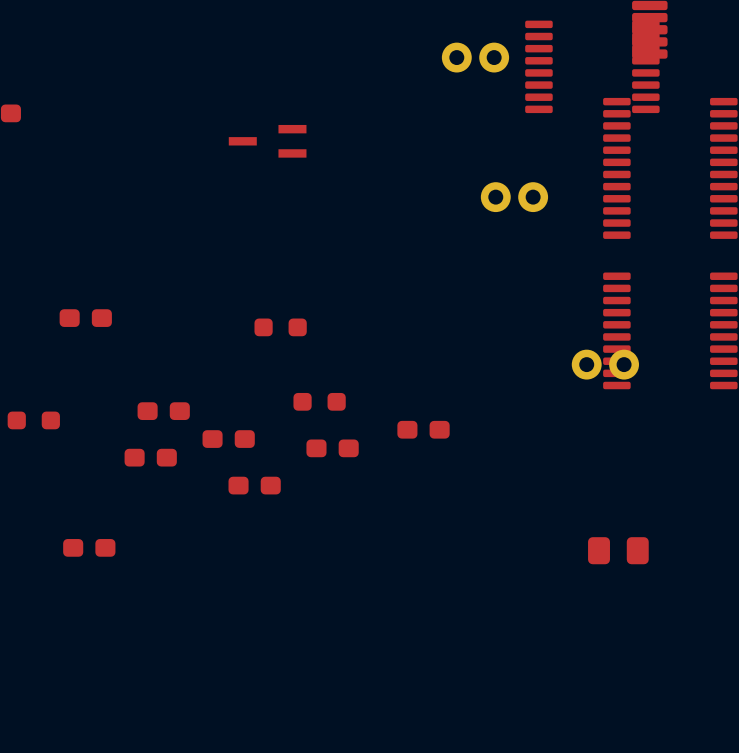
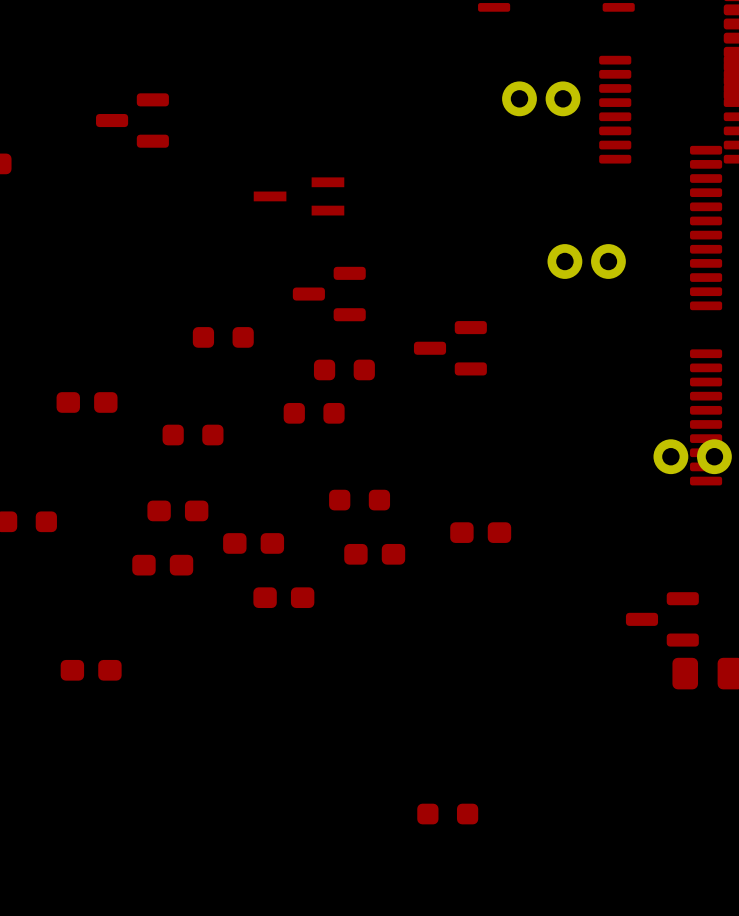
part: none -> (132, 120)
part: none -> (329, 294)
part: none -> (223, 337)
part: none -> (450, 348)
part: none -> (344, 369)
part: none -> (193, 435)
part: none -> (662, 619)
part: none -> (447, 814)

